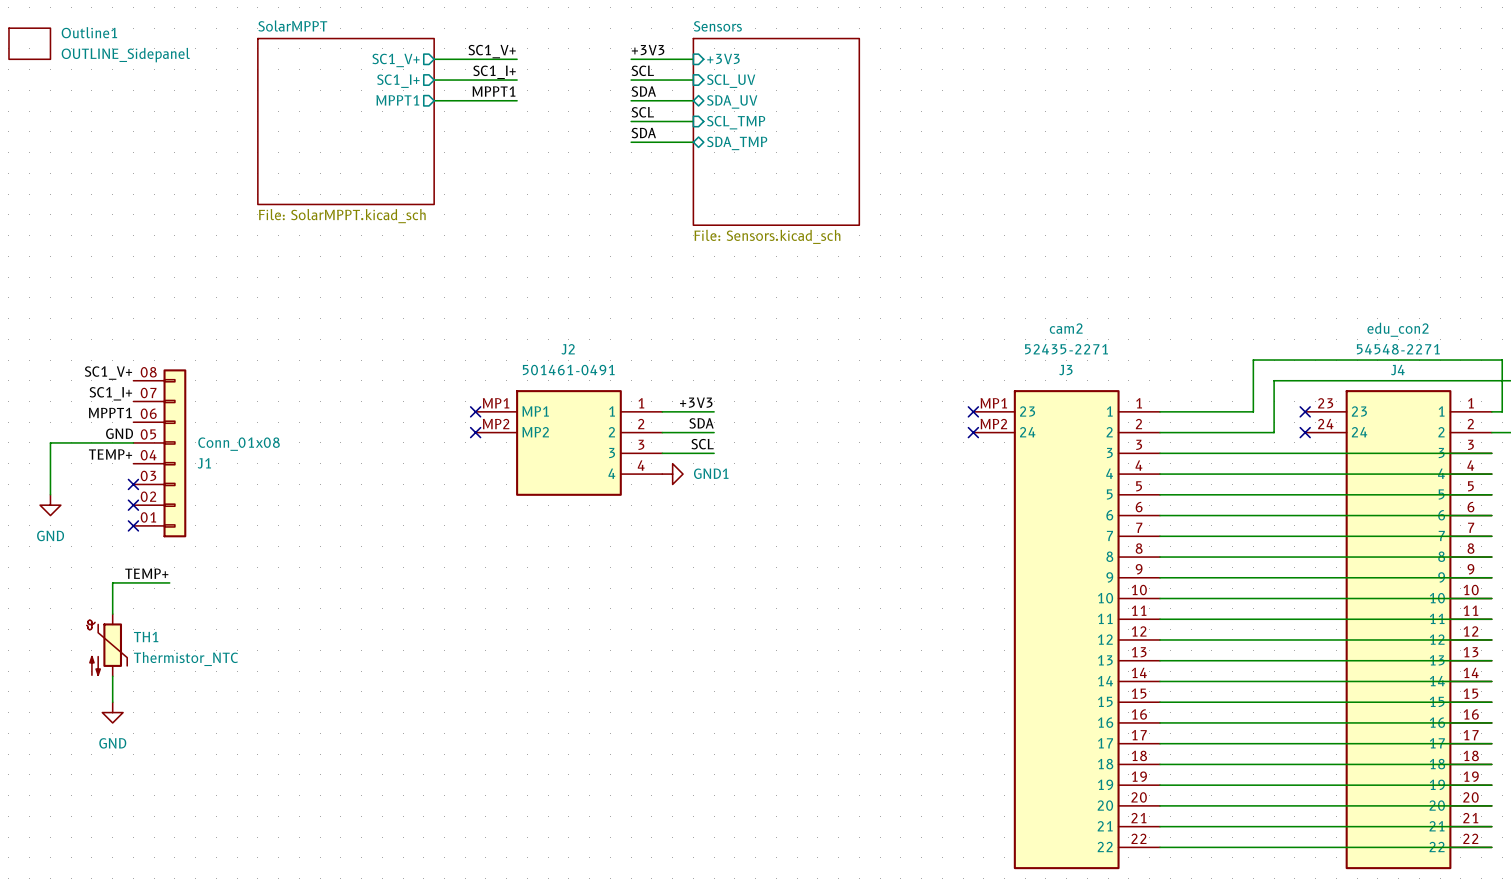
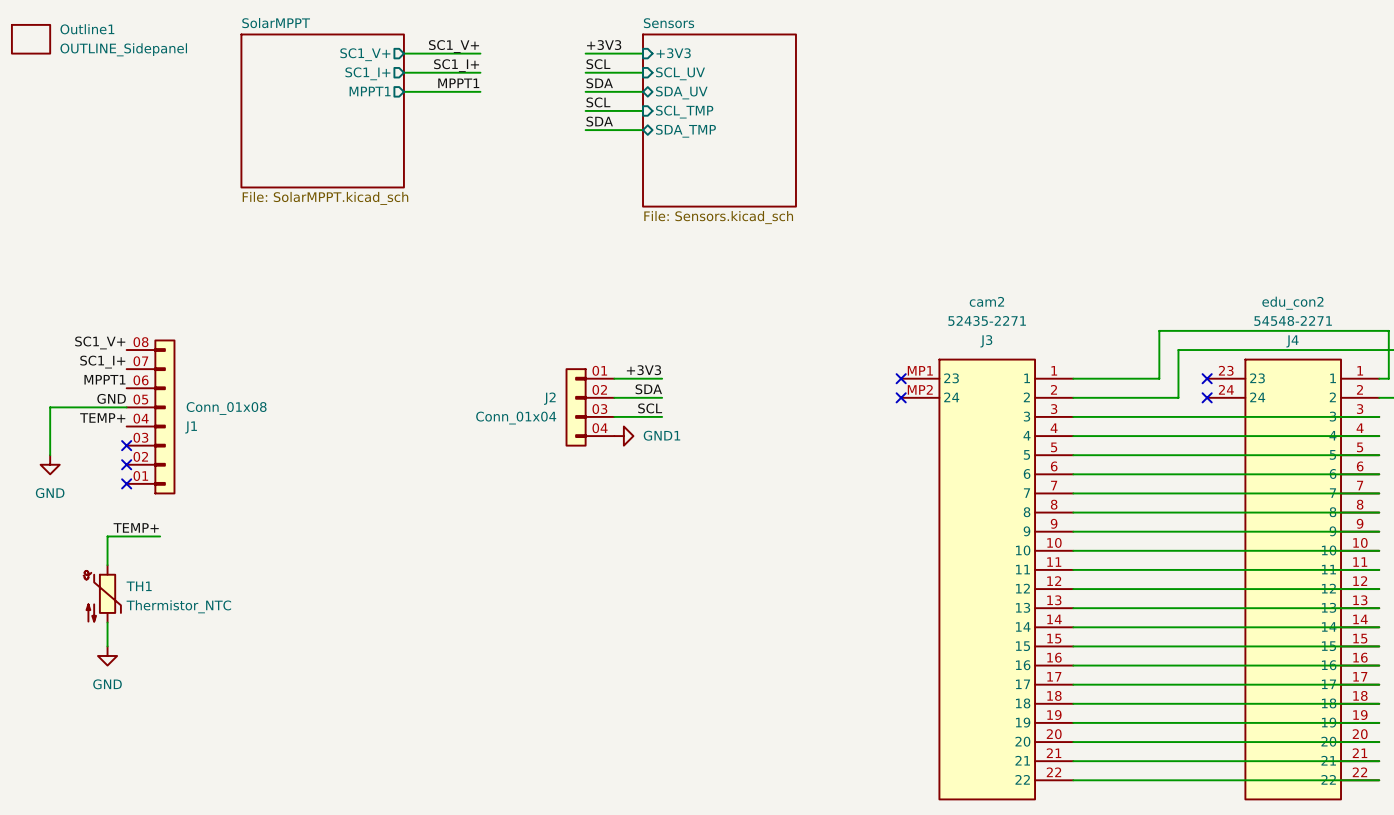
no-connect mark: (475, 411) -> none
no-connect mark: (475, 432) -> none
part: (568, 442) -> none
J2: none -> Conn_01x04 (589, 407)

